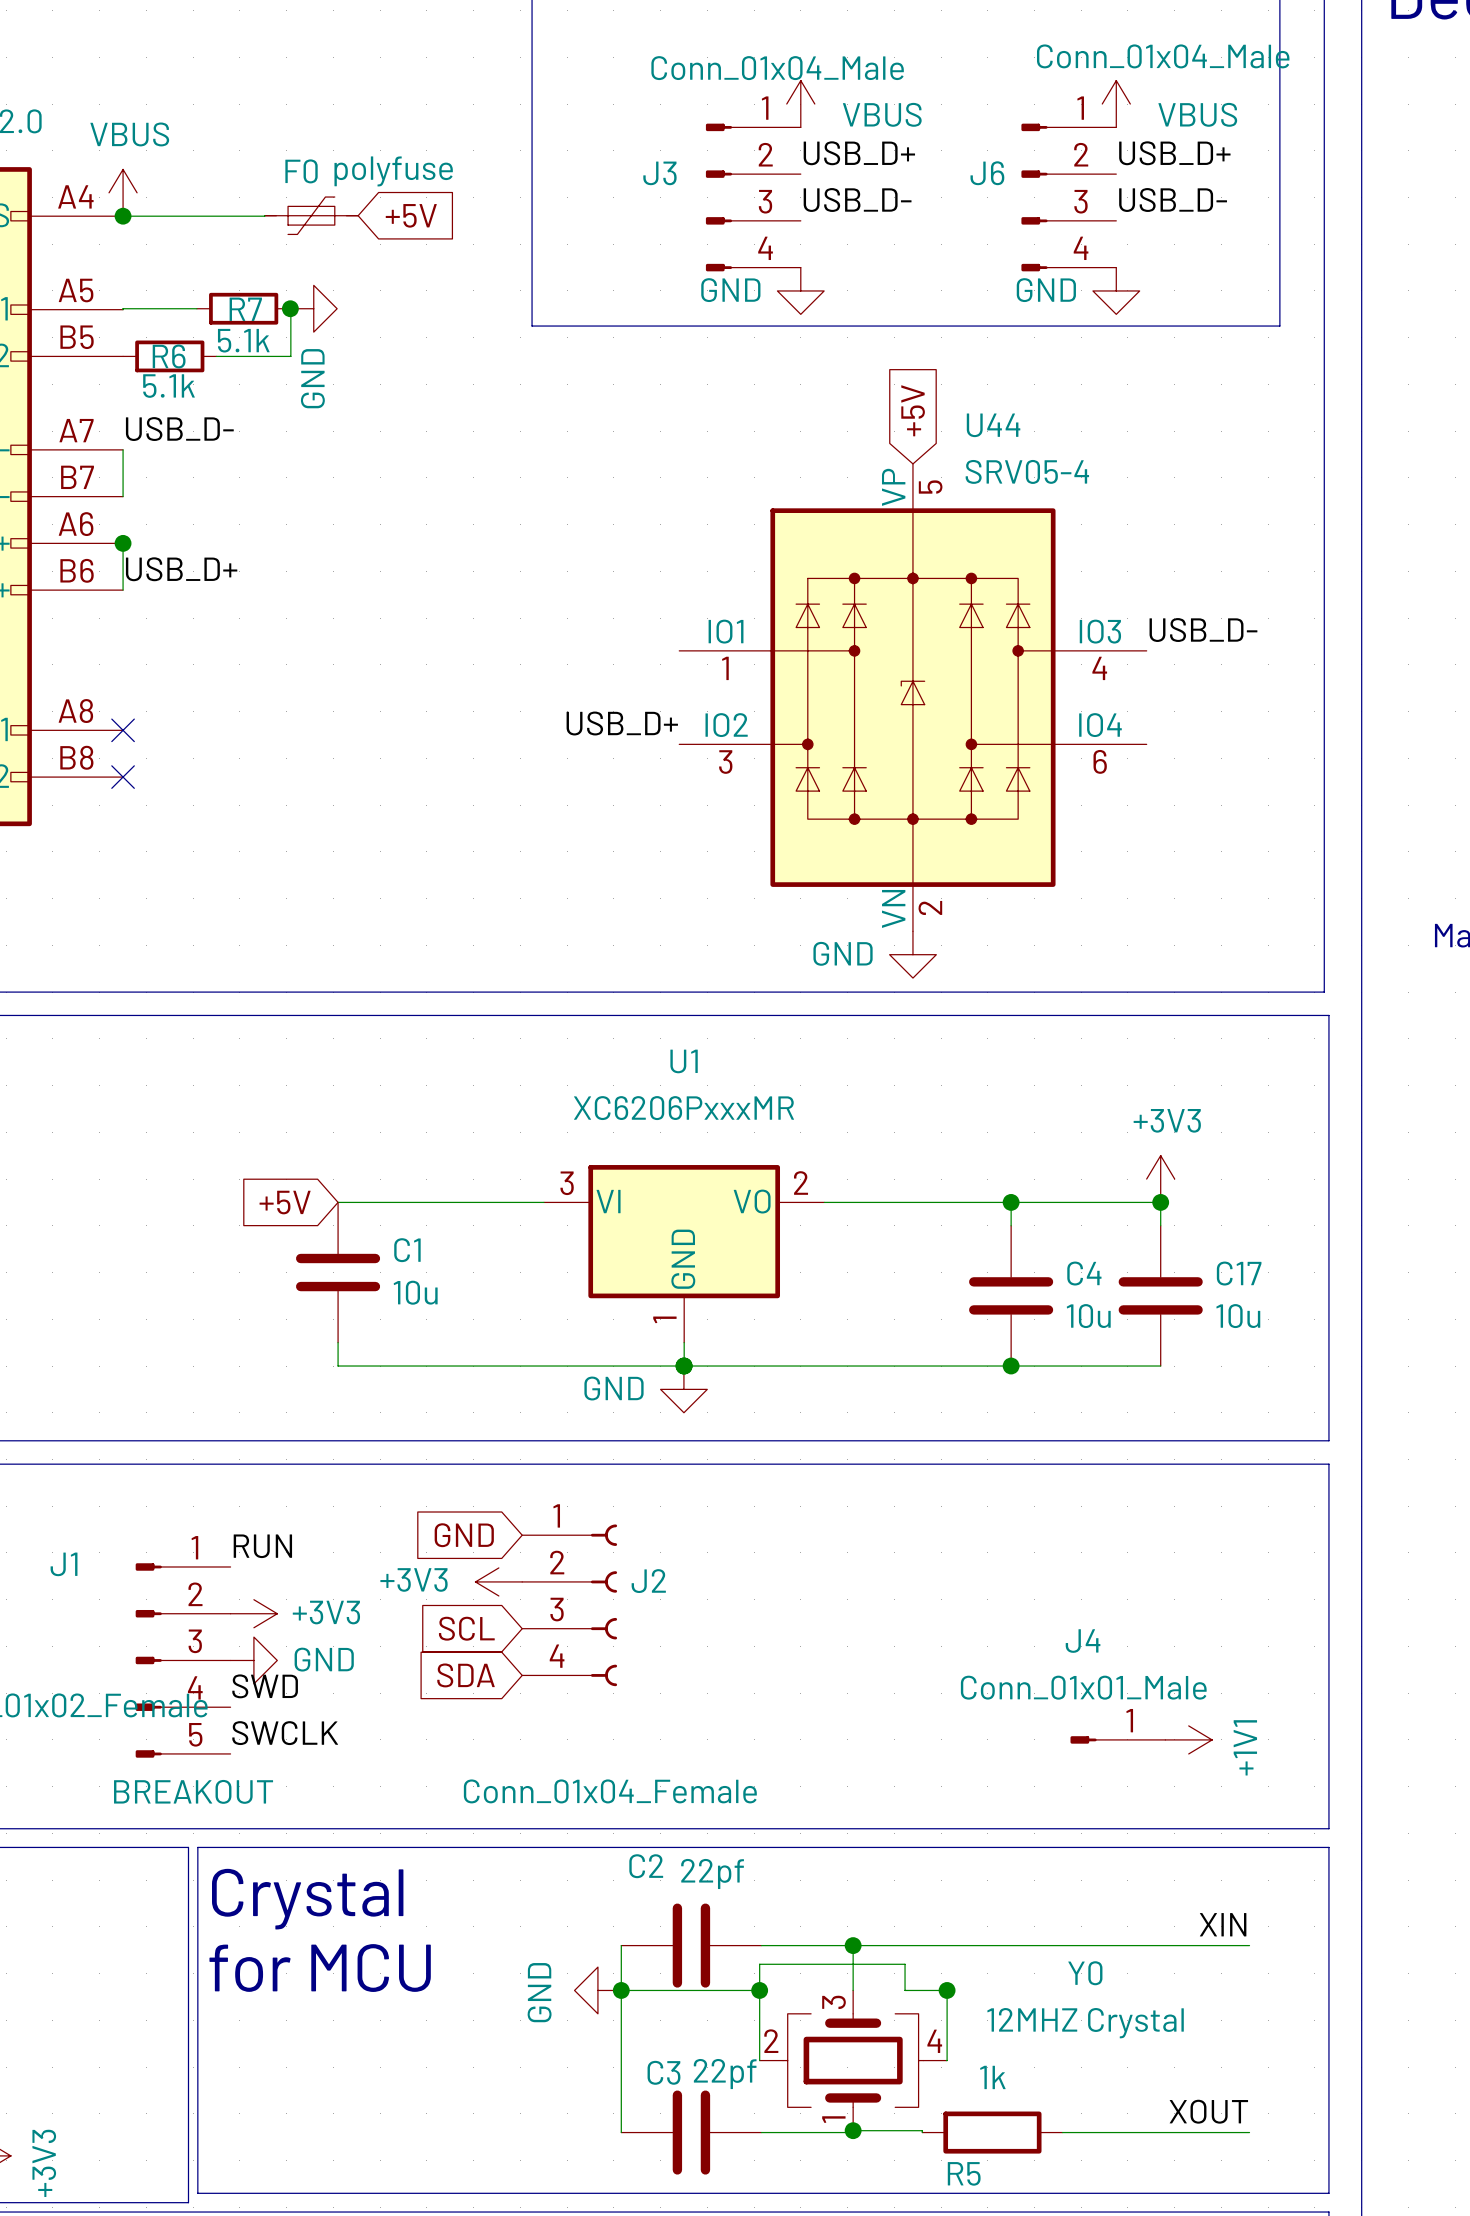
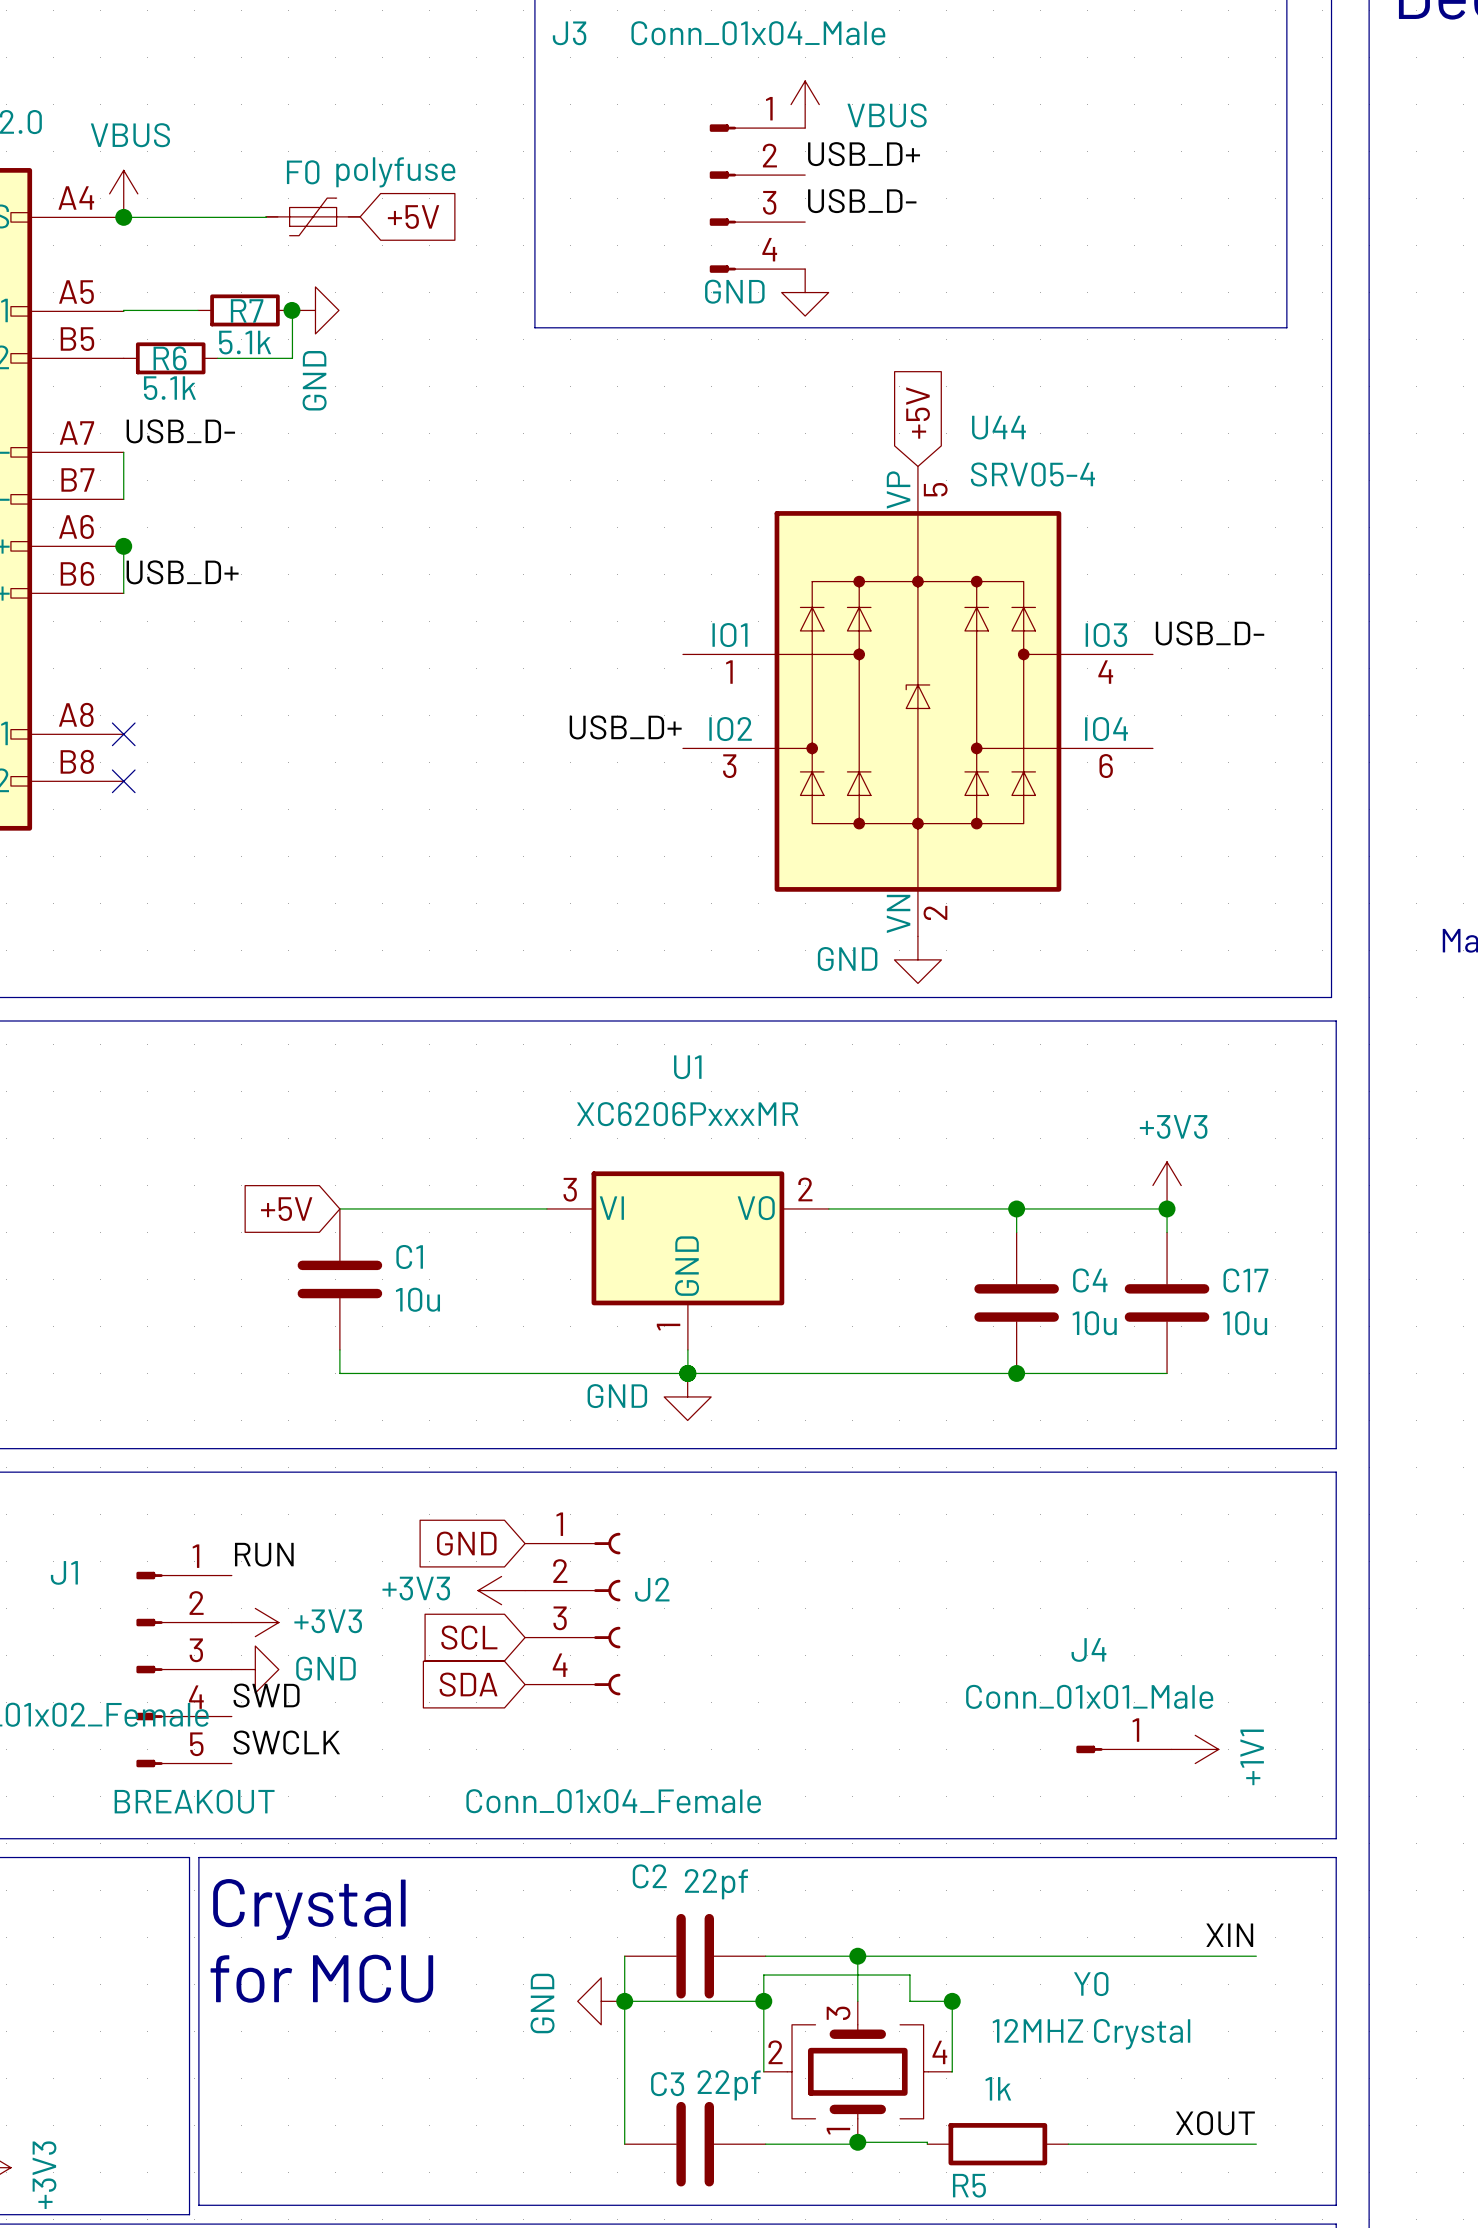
J3 value position: Conn_01x04_Male (777, 68) -> Conn_01x04_Male (758, 33)
power symbol: VBUS (1116, 104) -> none
label: USB_D+ (1174, 153) -> none
J3 name position: J3 (659, 173) -> J3 (569, 33)
J6: Conn_01x04_Male (1068, 197) -> none
label: USB_D- (1173, 200) -> none
power symbol: GND (1116, 290) -> none

